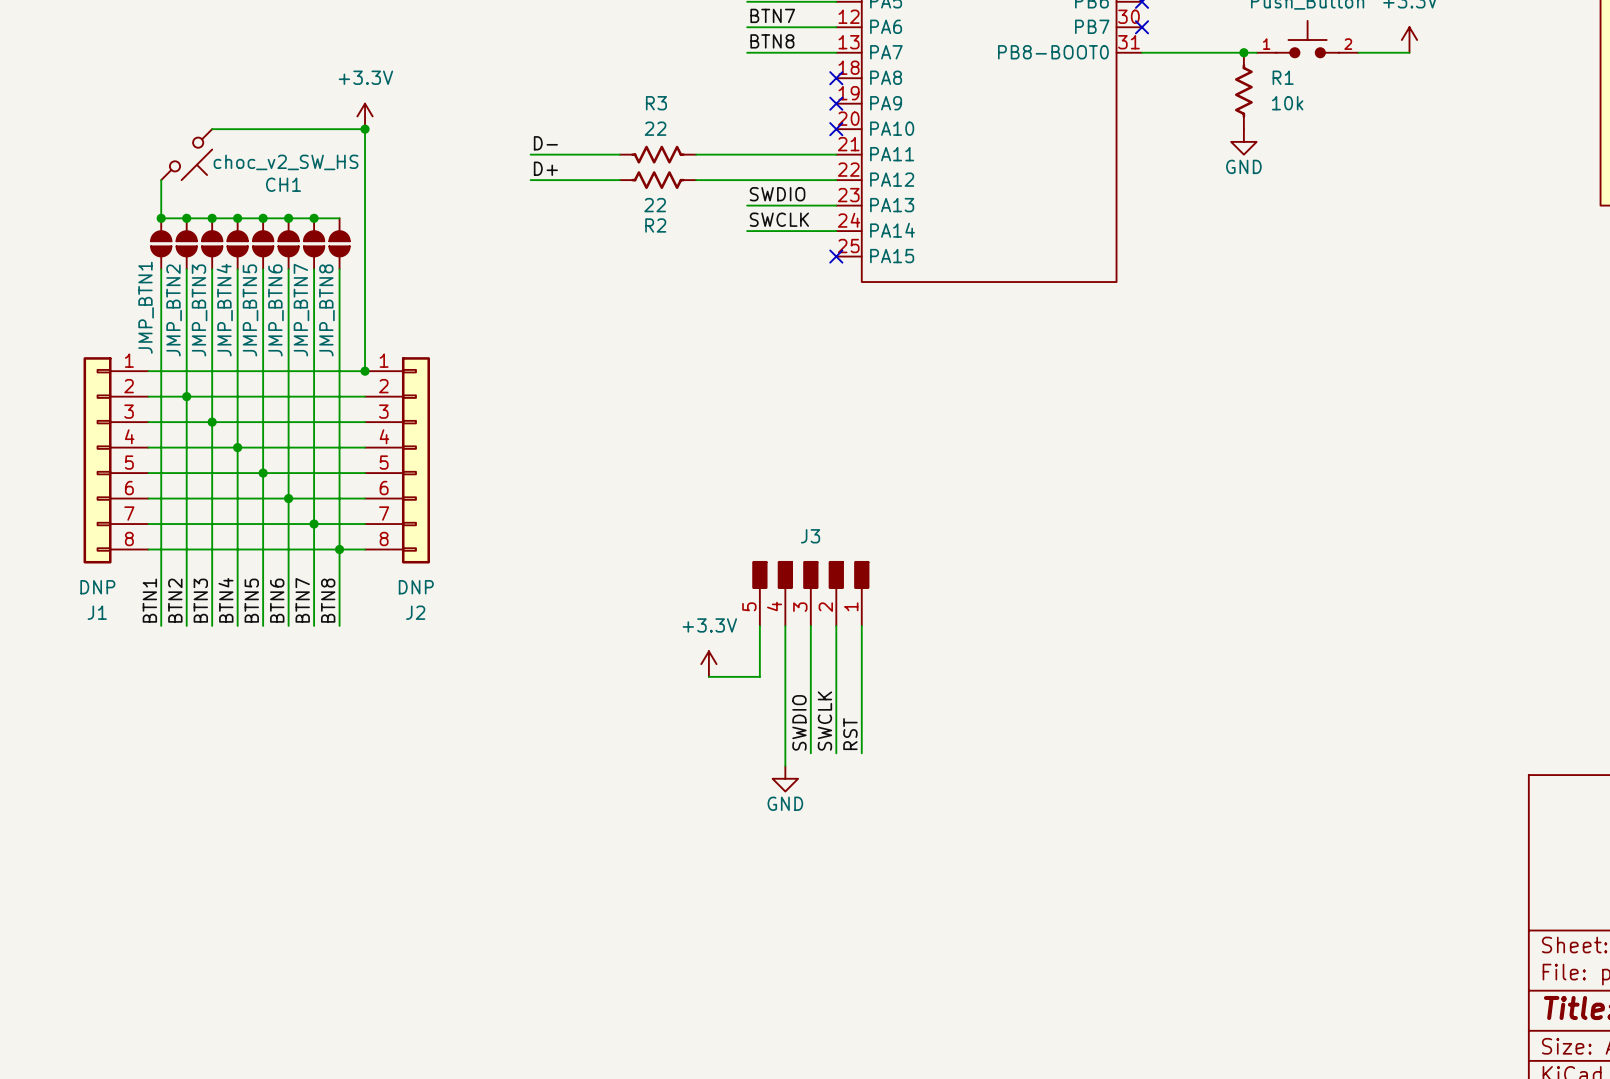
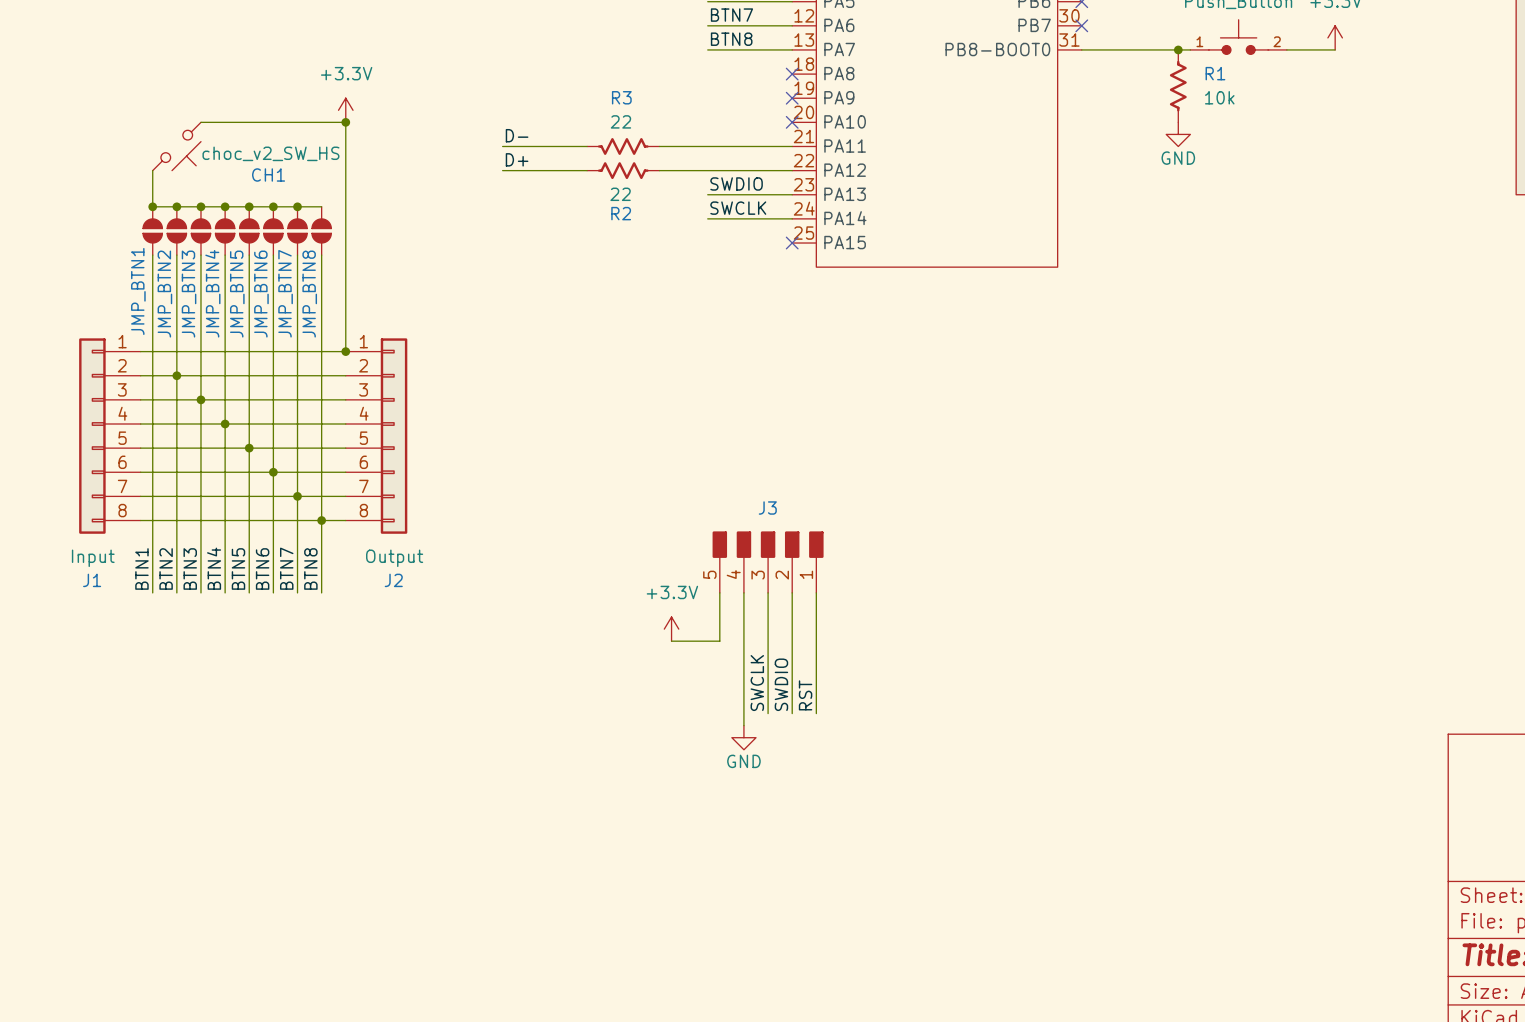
J1 value: DNP (97, 587) -> Input (93, 558)
J2 value: DNP (416, 587) -> Output (394, 558)
label: SWCLK (824, 721) -> SWDIO (781, 684)
label: SWDIO (799, 722) -> SWCLK (757, 683)

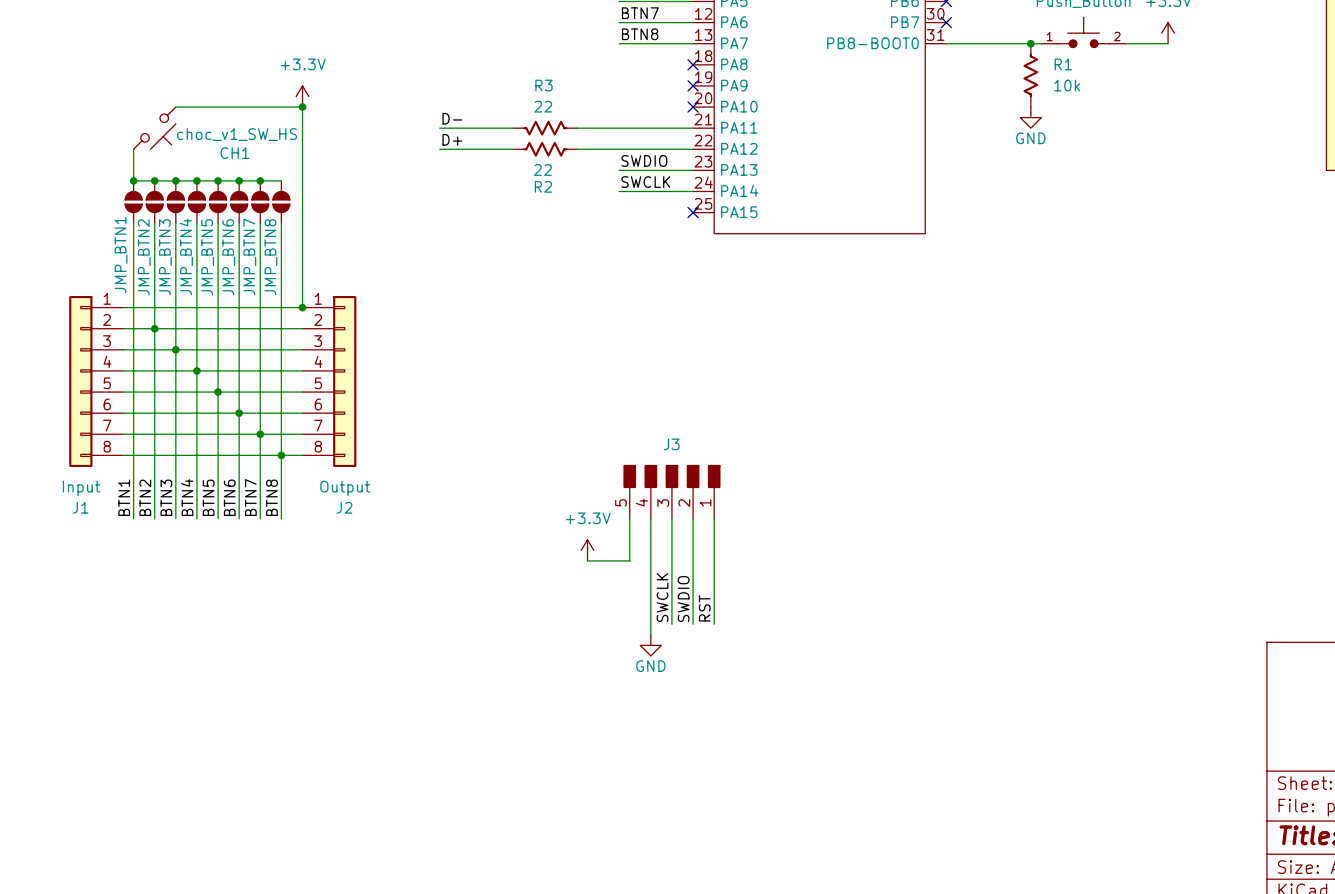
CH1 value: choc_v2_SW_HS (270, 153) -> choc_v1_SW_HS (237, 134)

